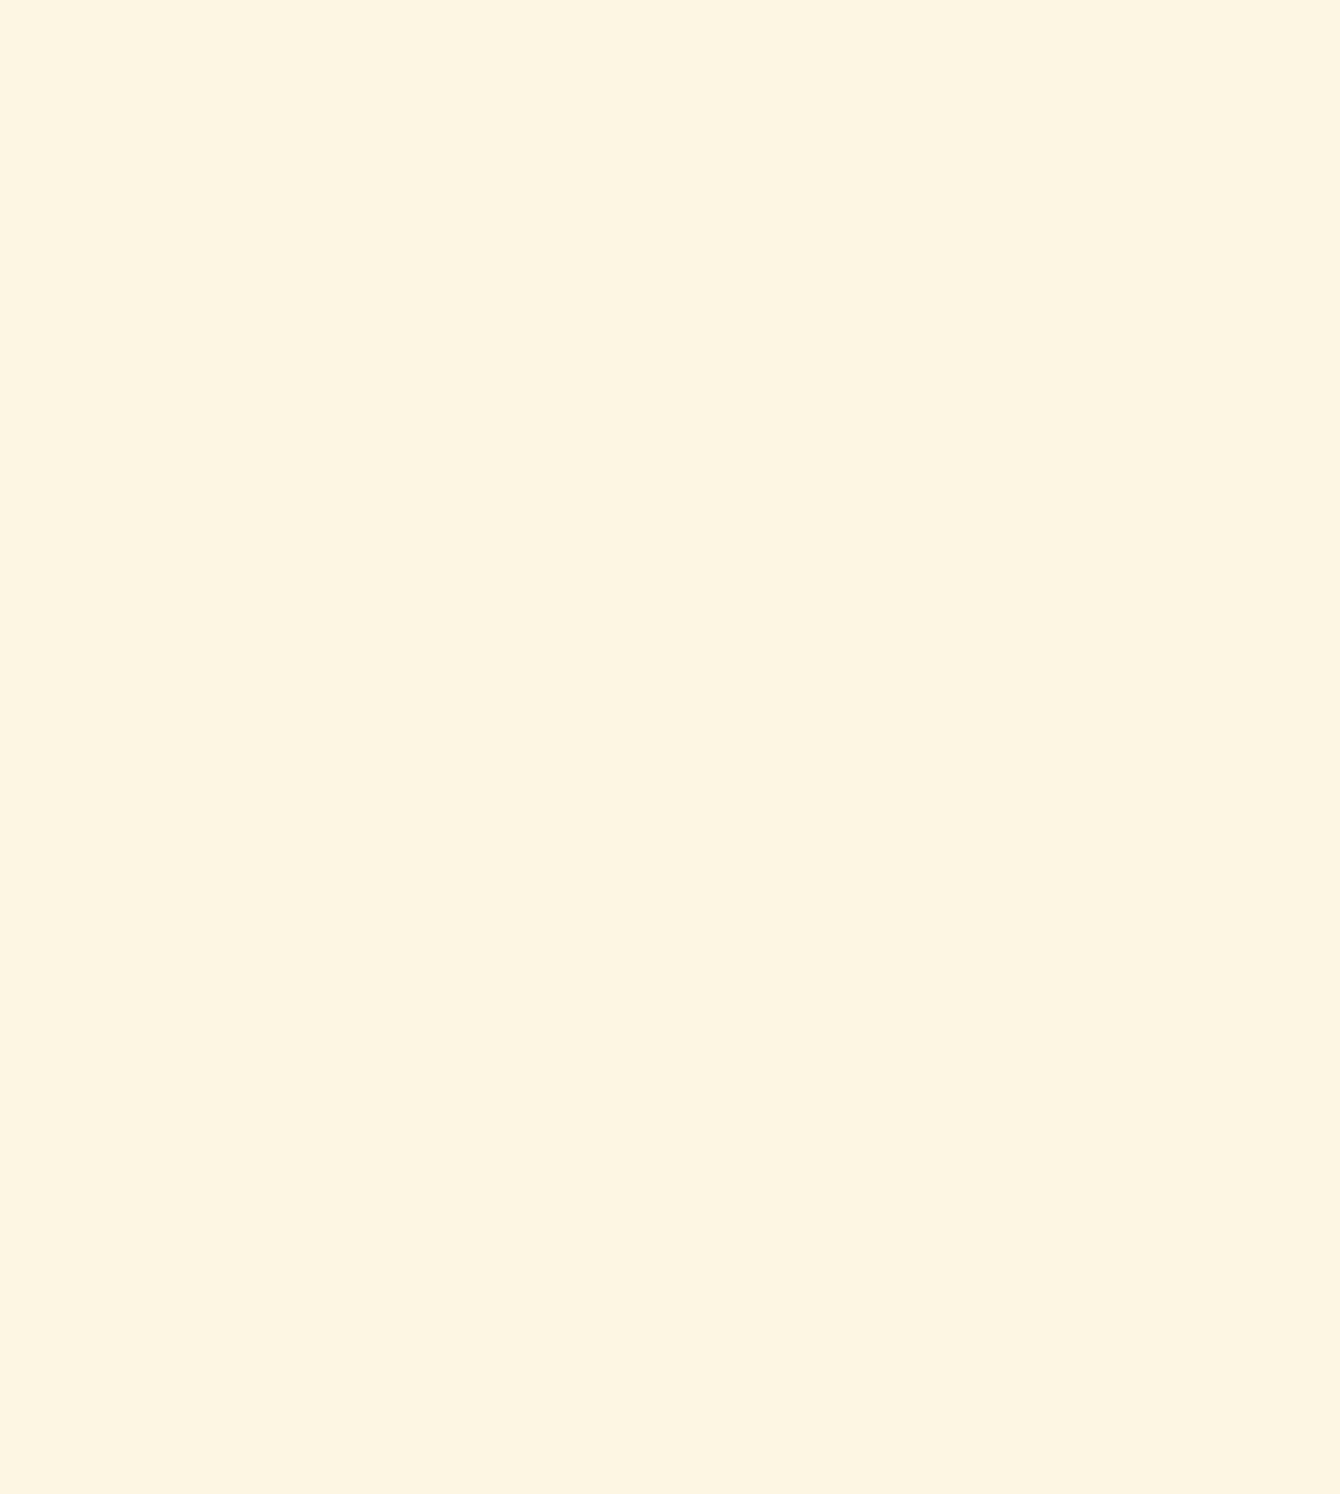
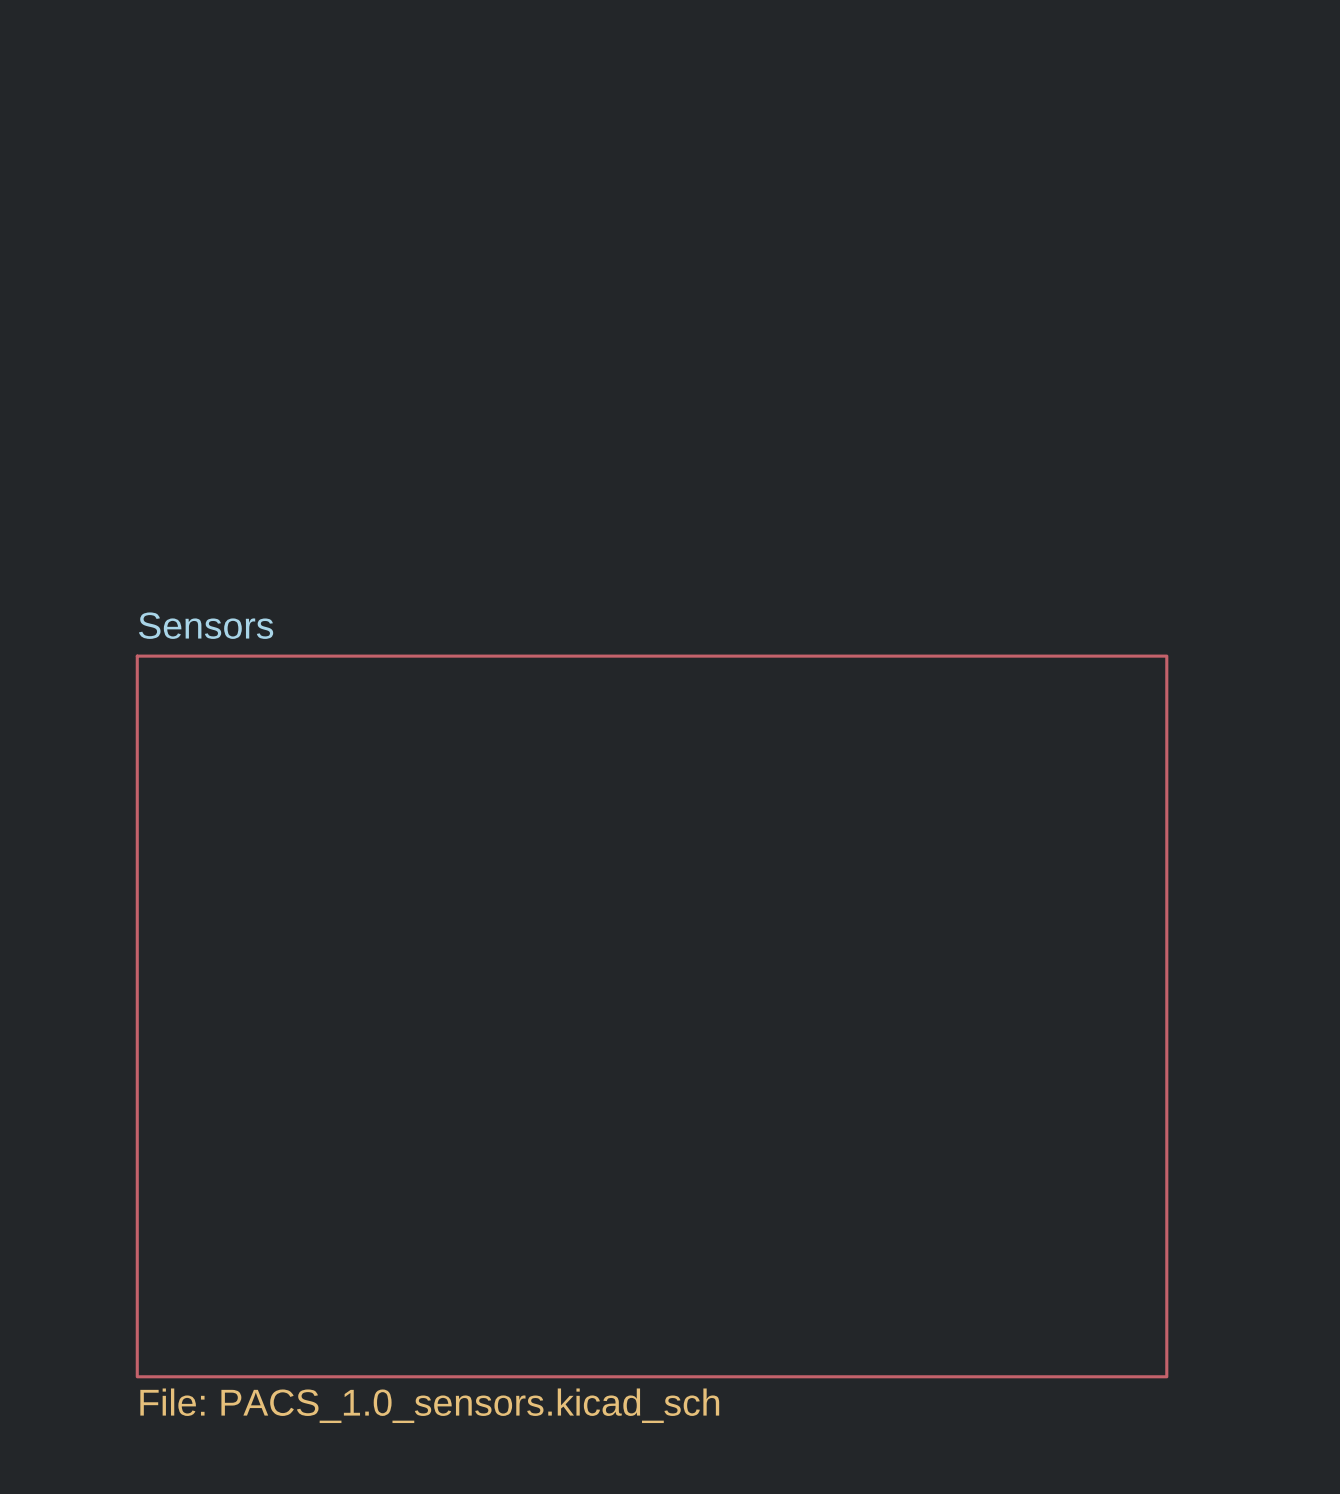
sheet Sensors: none -> File: PACS_1.0_sensors.kicad_sch (652, 1016)

